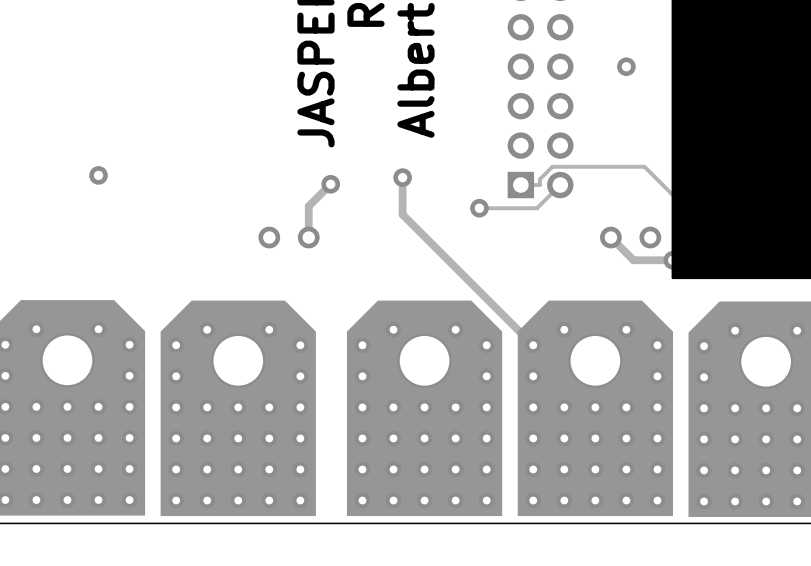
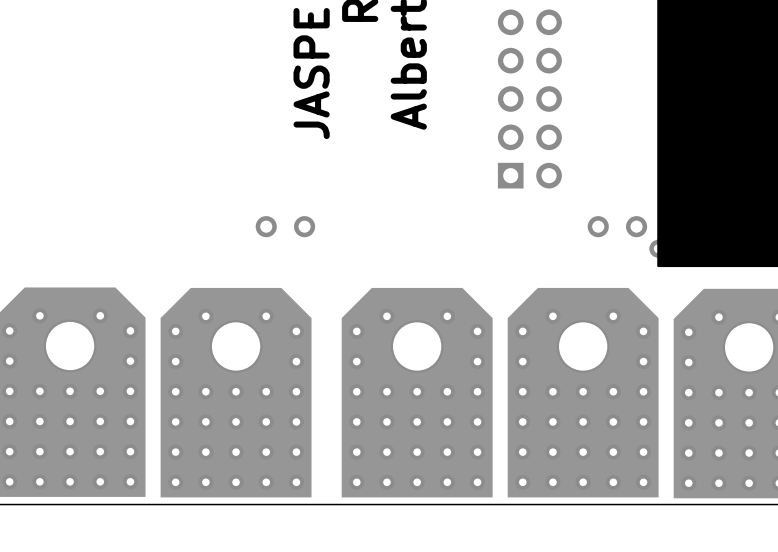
via: (626, 66) -> none
via: (98, 175) -> none
track: (402, 177) (402, 214) (533, 345) -> none
via: (402, 177) -> none
track: (330, 184) (308, 206) (308, 237) -> none
via: (330, 184) -> none
track: (520, 185) (539, 185) (539, 179) (552, 166) (644, 166) (703, 226) -> none
track: (560, 185) (537, 208) (479, 208) -> none
via: (479, 208) -> none
track: (610, 237) (633, 260) (672, 260) -> none

